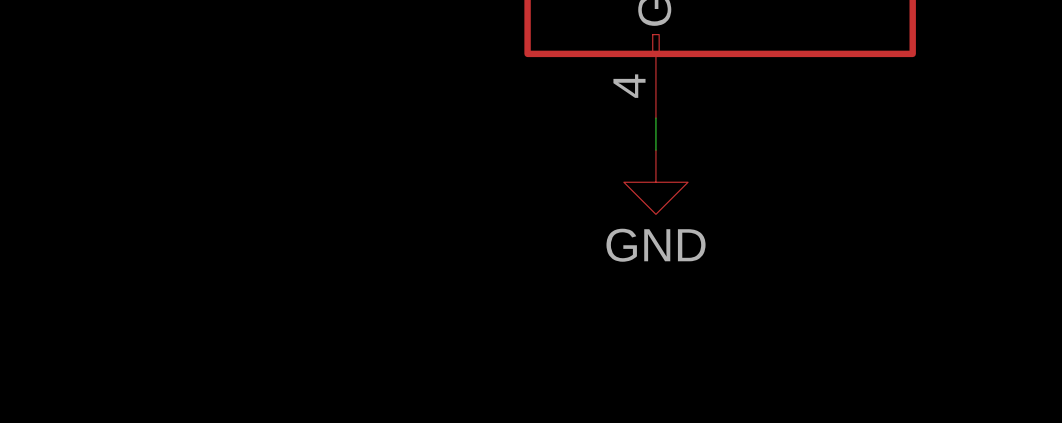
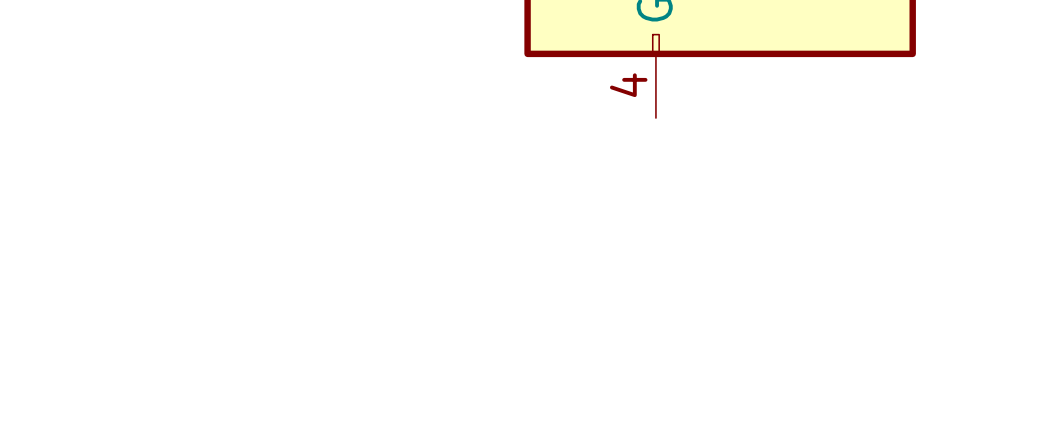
wire: (655, 118) (655, 150) -> none
power symbol: GND (655, 182) -> none

